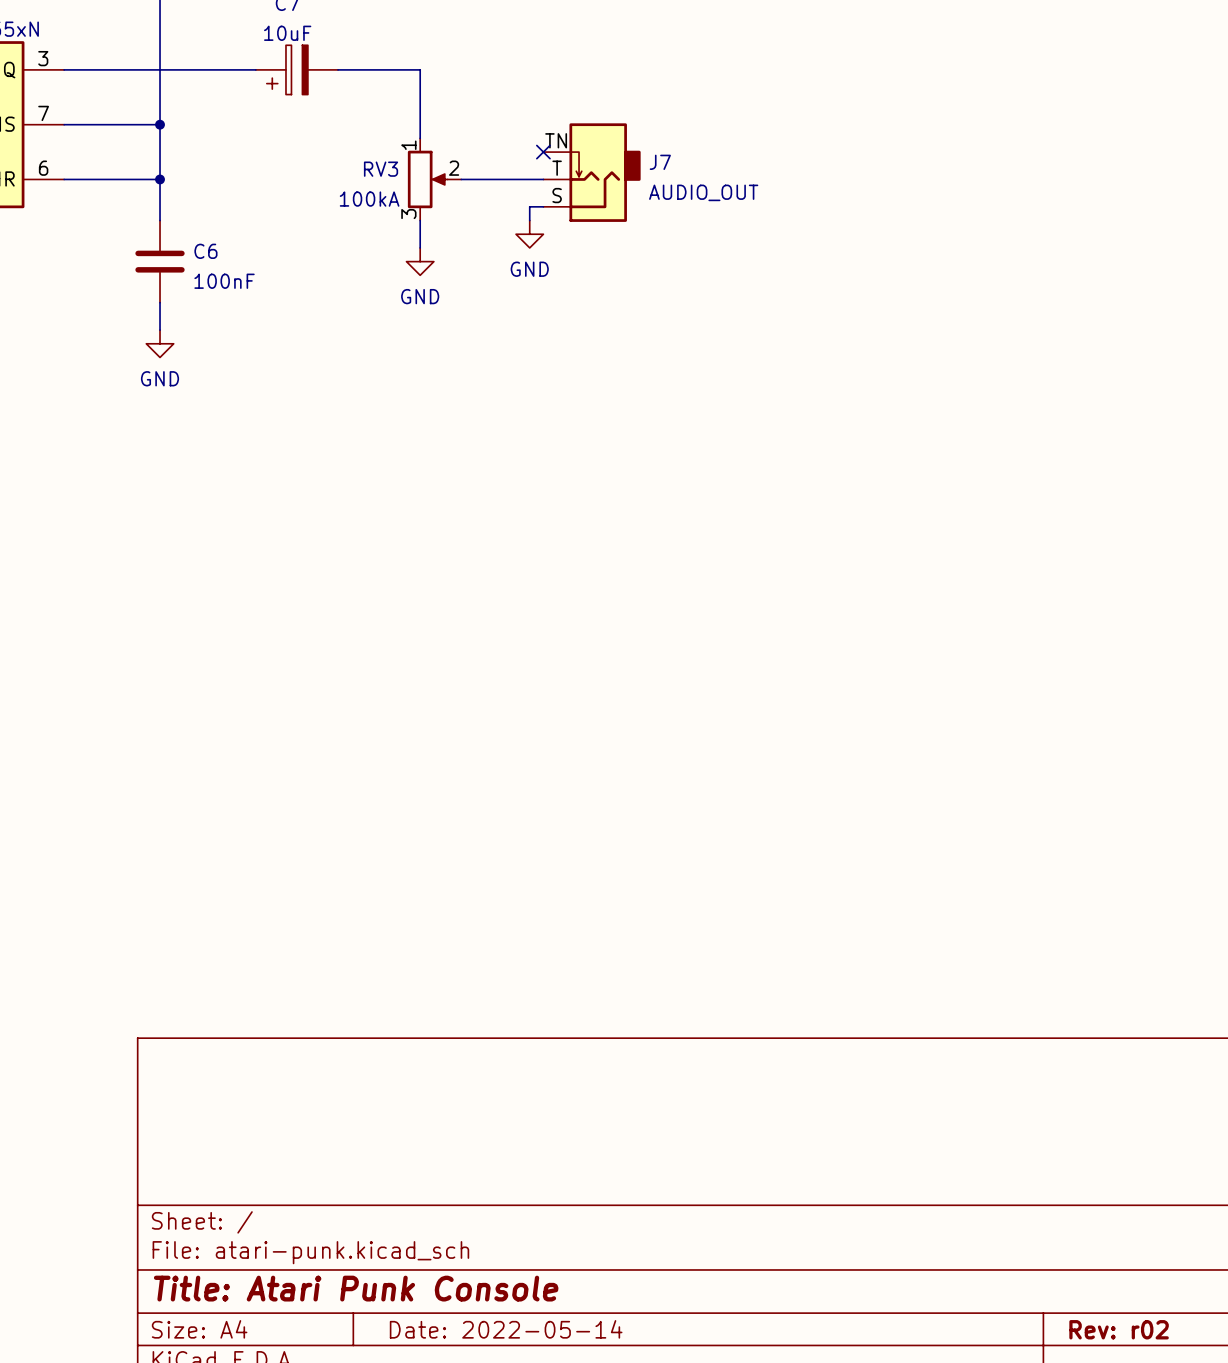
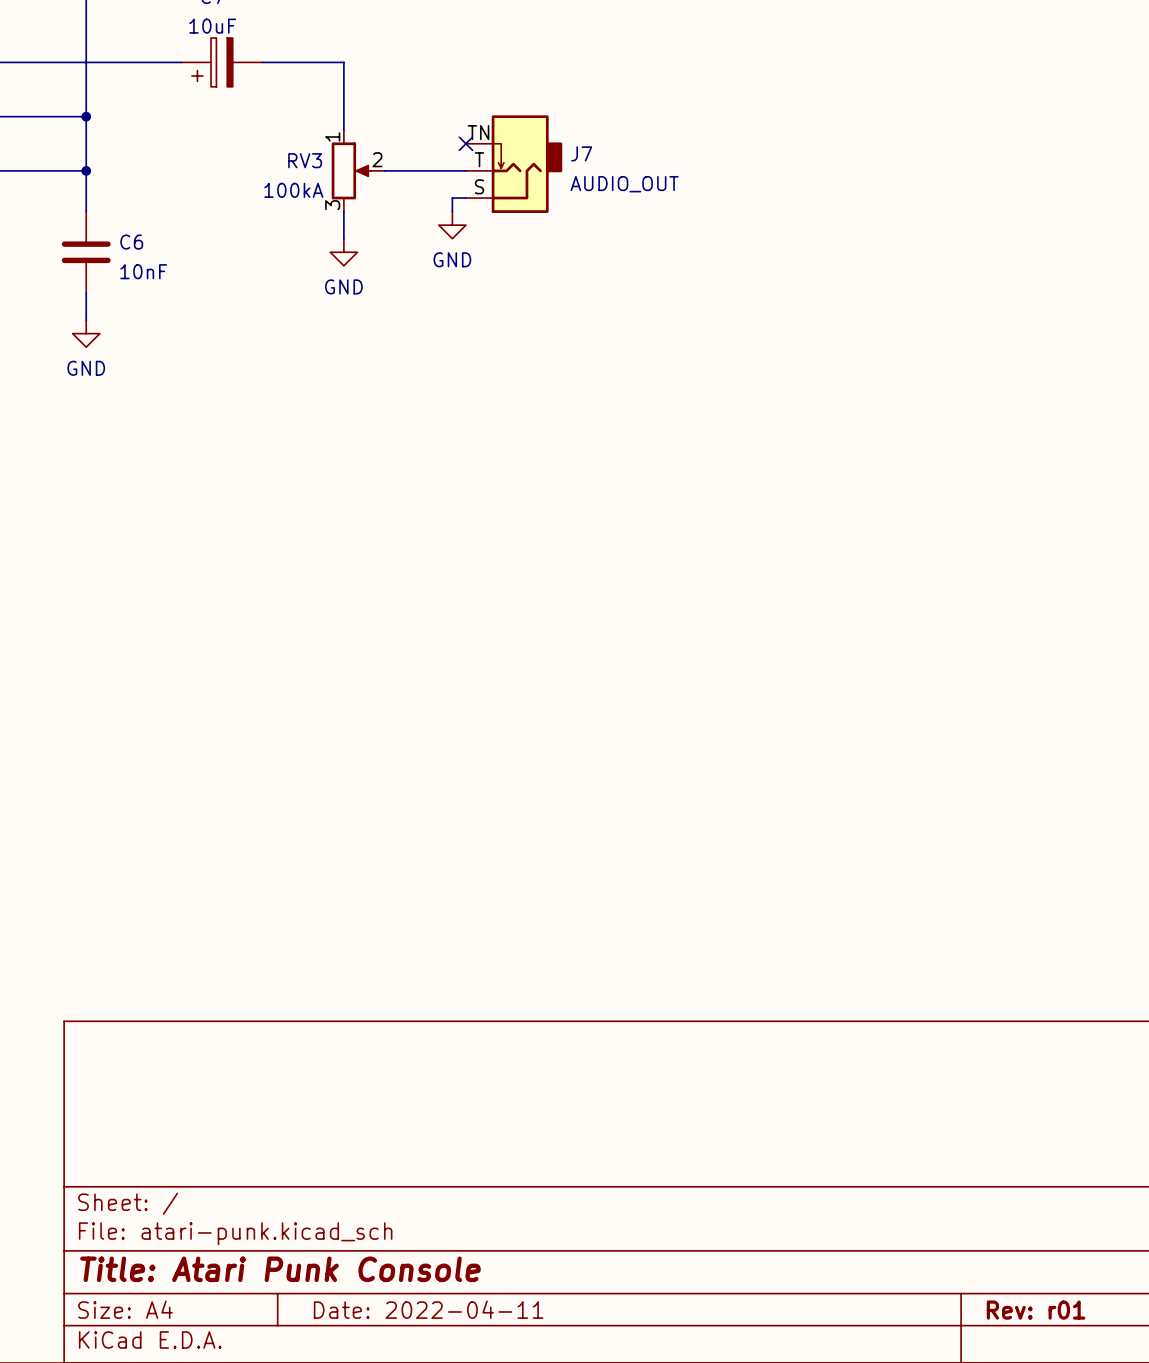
C6 value: 100nF (224, 281) -> 10nF (143, 271)
title block: Date: 2022-05-14 (506, 1329) -> Date: 2022-04-11 (428, 1309)
title block: Rev: r02 (1119, 1329) -> Rev: r01 (1036, 1310)

